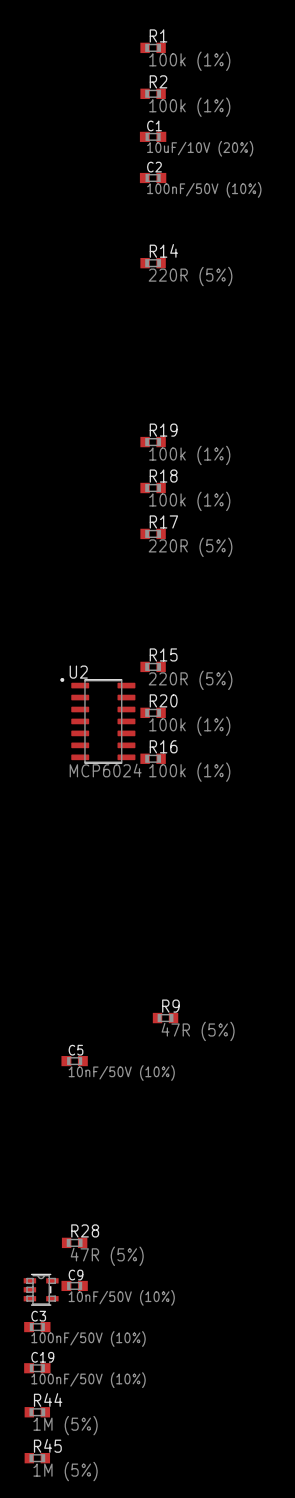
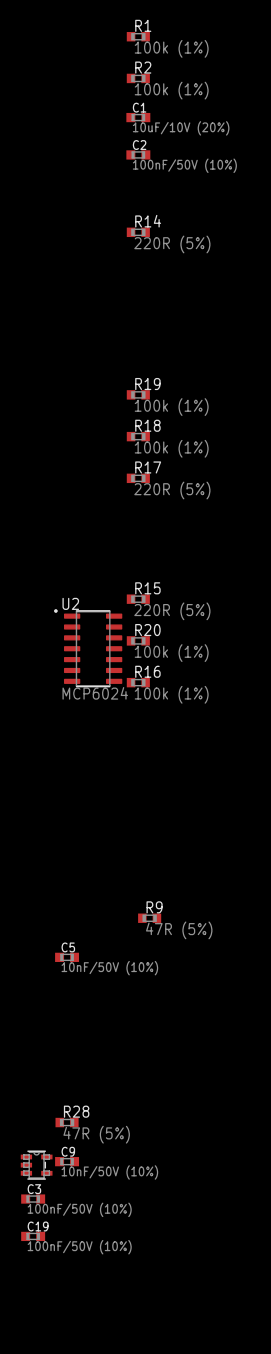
R44: 1M (5%) (37, 1412) -> none
R45: 1M (5%) (37, 1458) -> none

